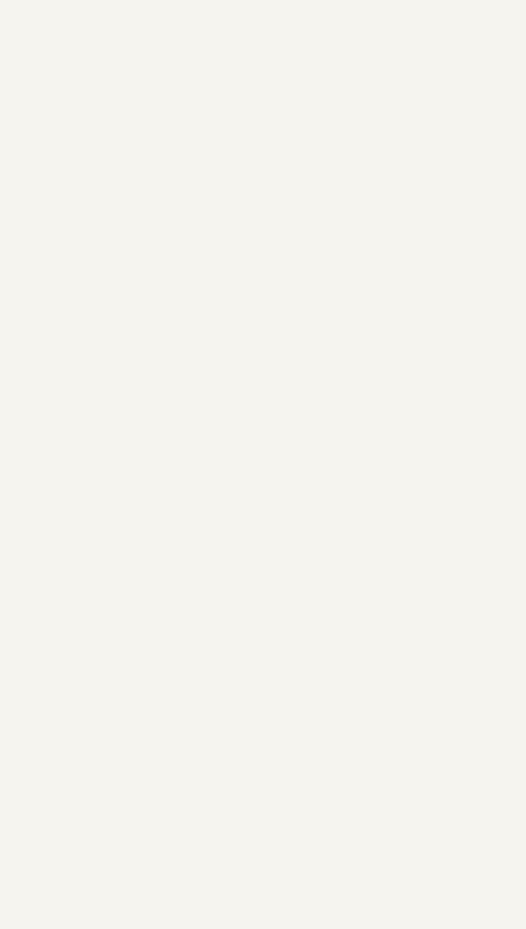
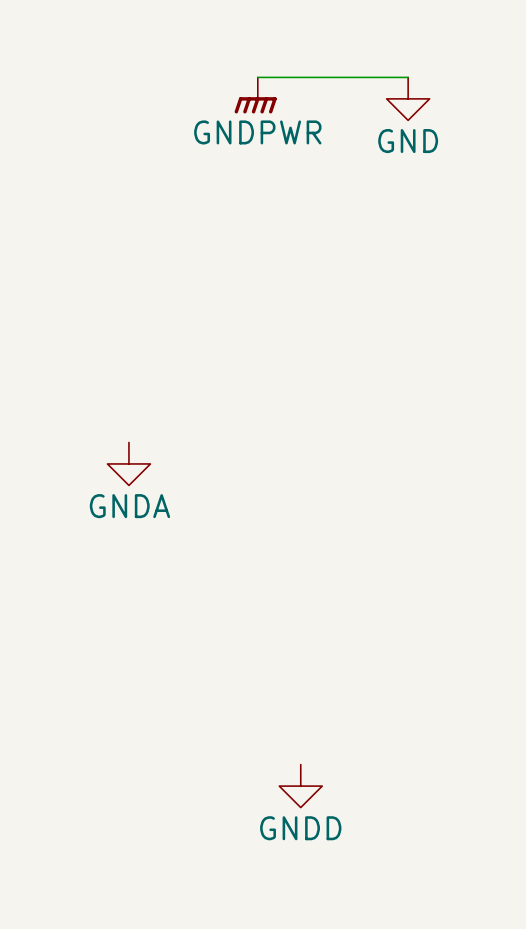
wire: none -> (257, 77) (408, 77)
power symbol: none -> GNDPWR (255, 95)
power symbol: none -> GND (408, 98)
power symbol: none -> GNDA (128, 463)
power symbol: none -> GNDD (300, 786)

